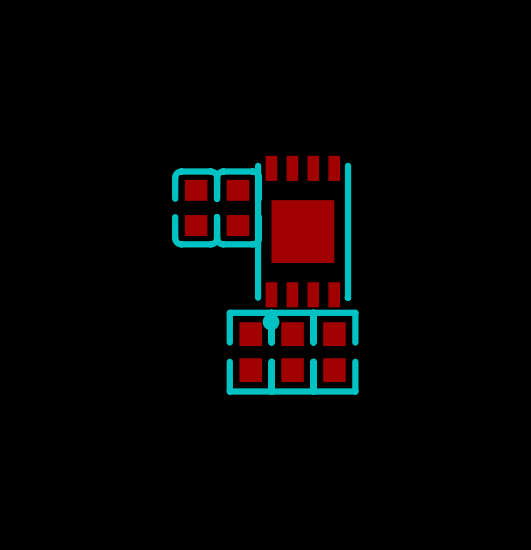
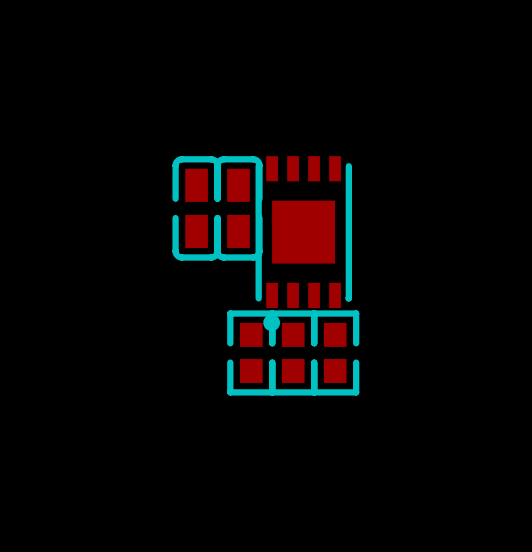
part footprint: [172, 168, 221, 248] -> [172, 156, 221, 261]
part footprint: [213, 168, 263, 248] -> [214, 156, 263, 261]

